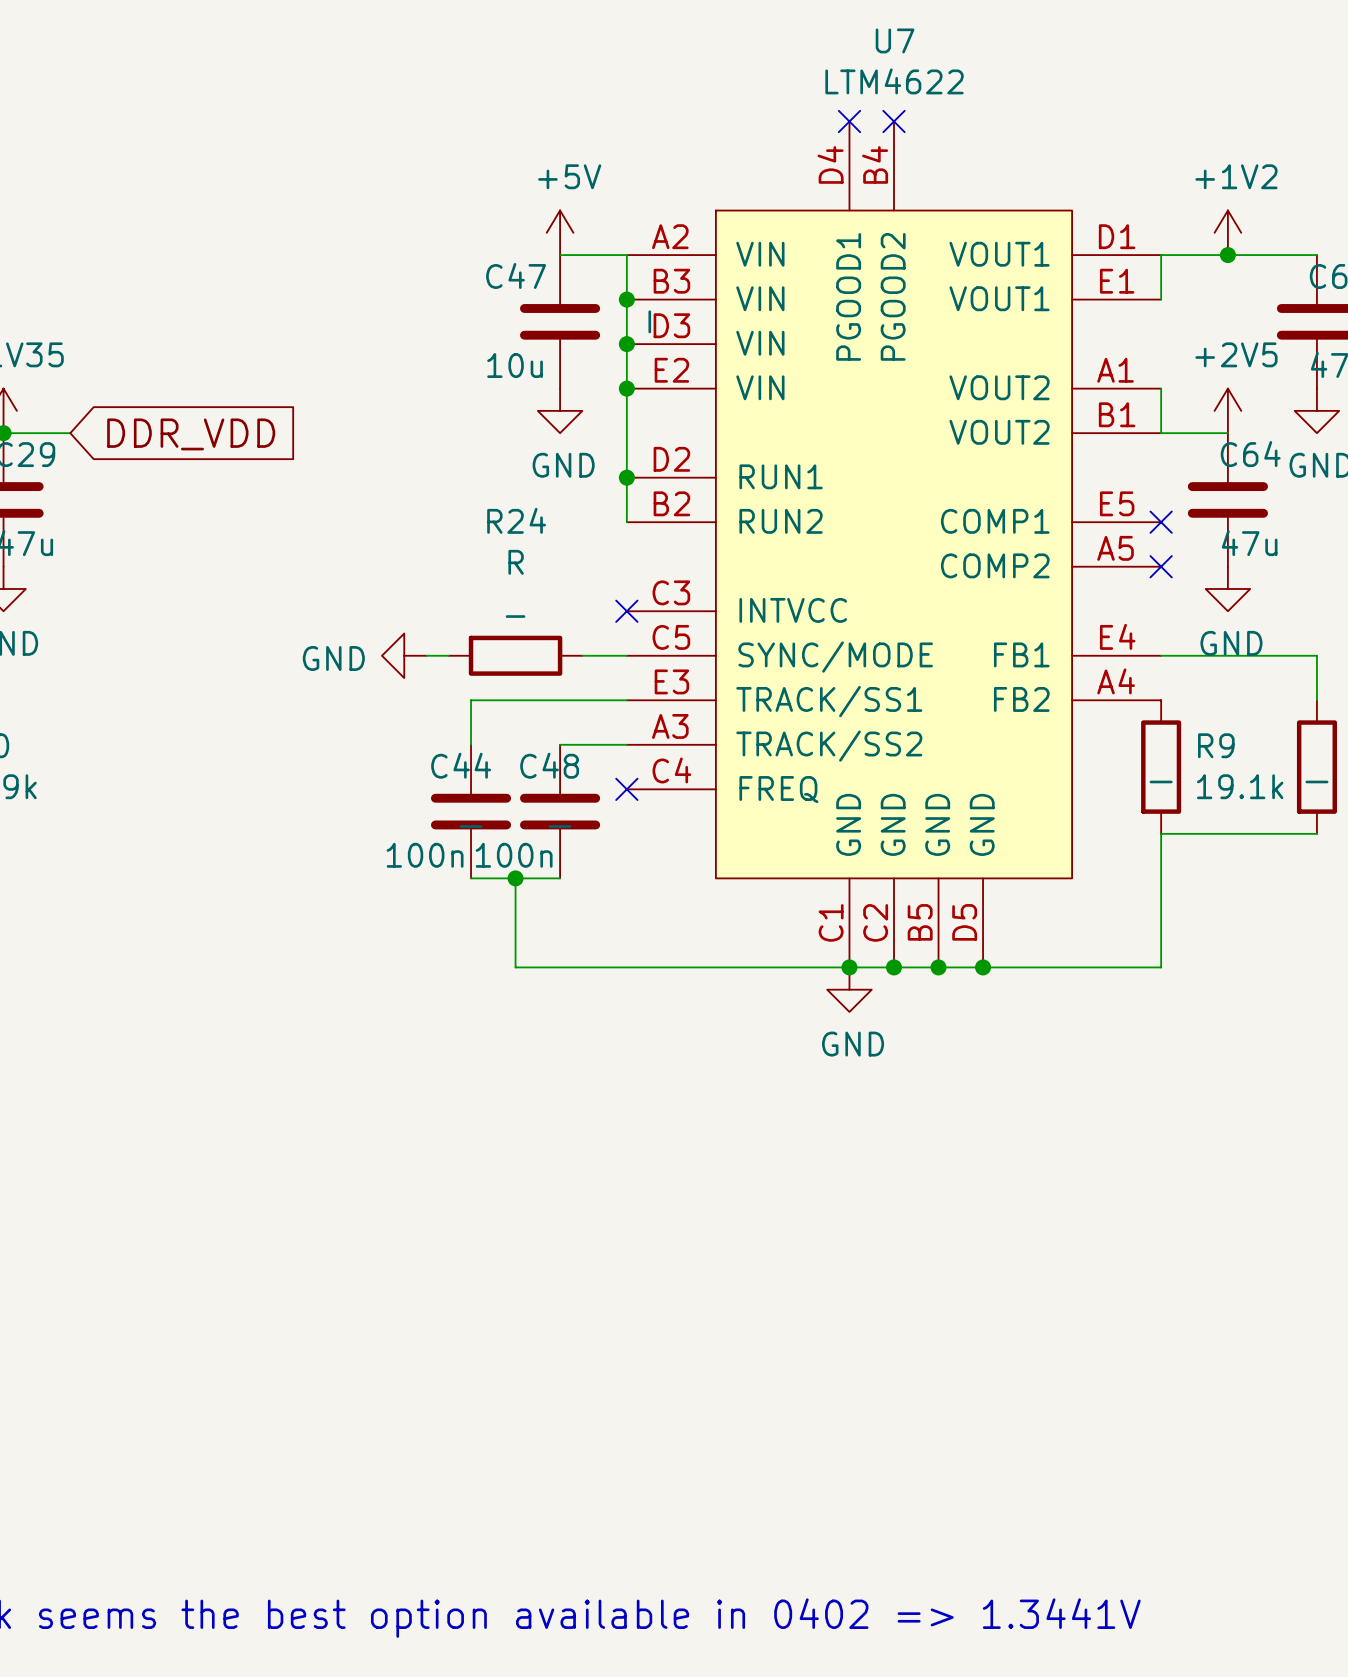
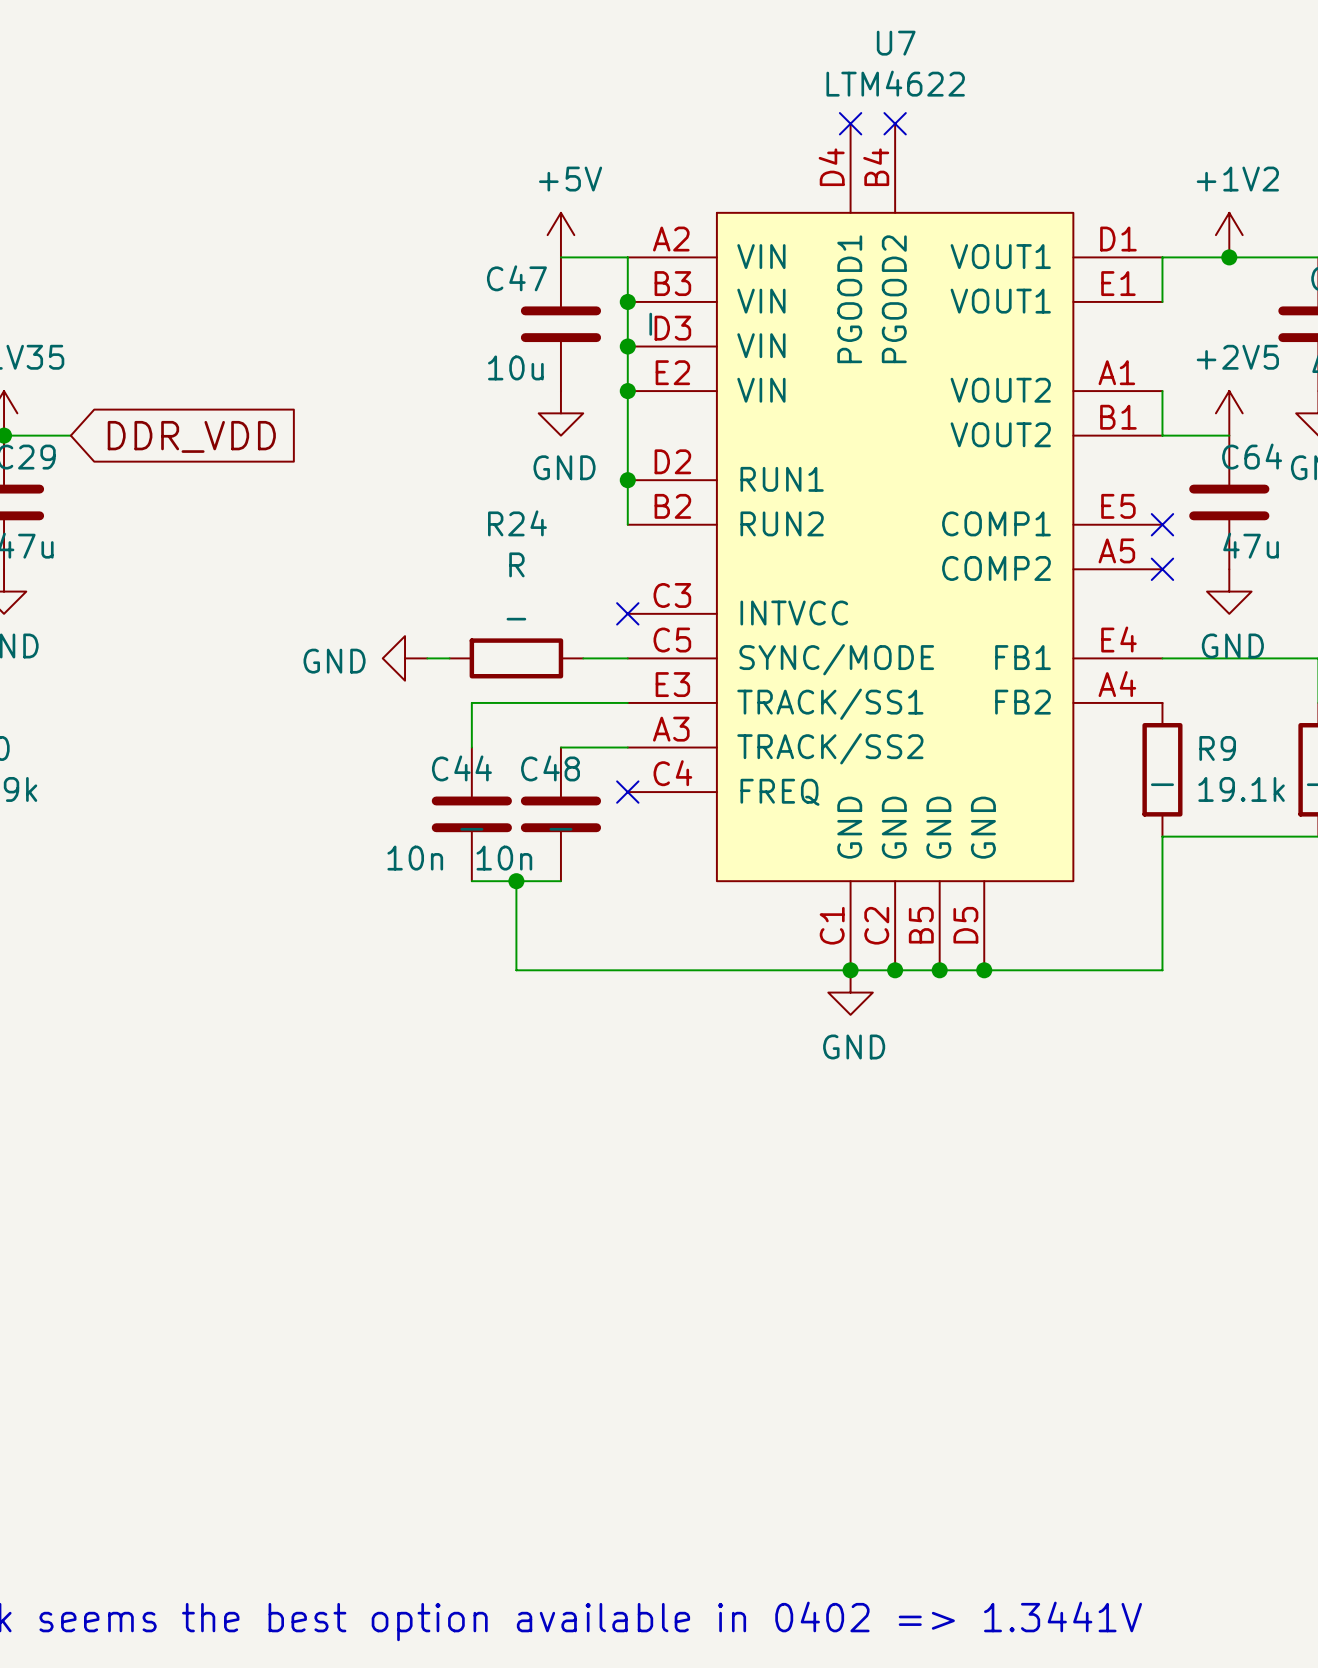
C44 value: 100n (425, 855) -> 10n (415, 858)
C48 value: 100n (514, 855) -> 10n (504, 858)

